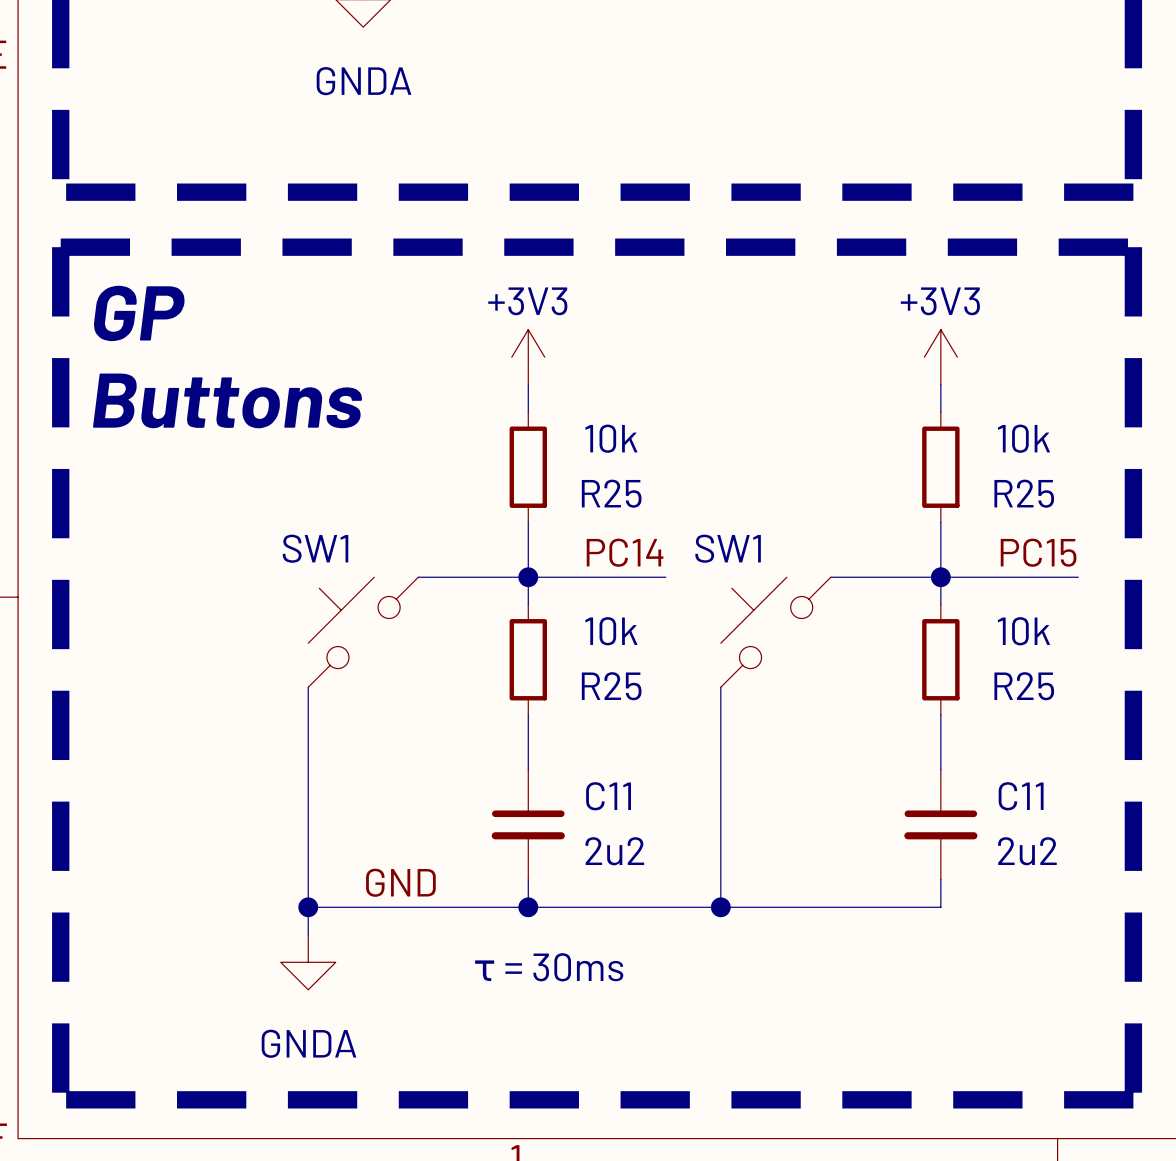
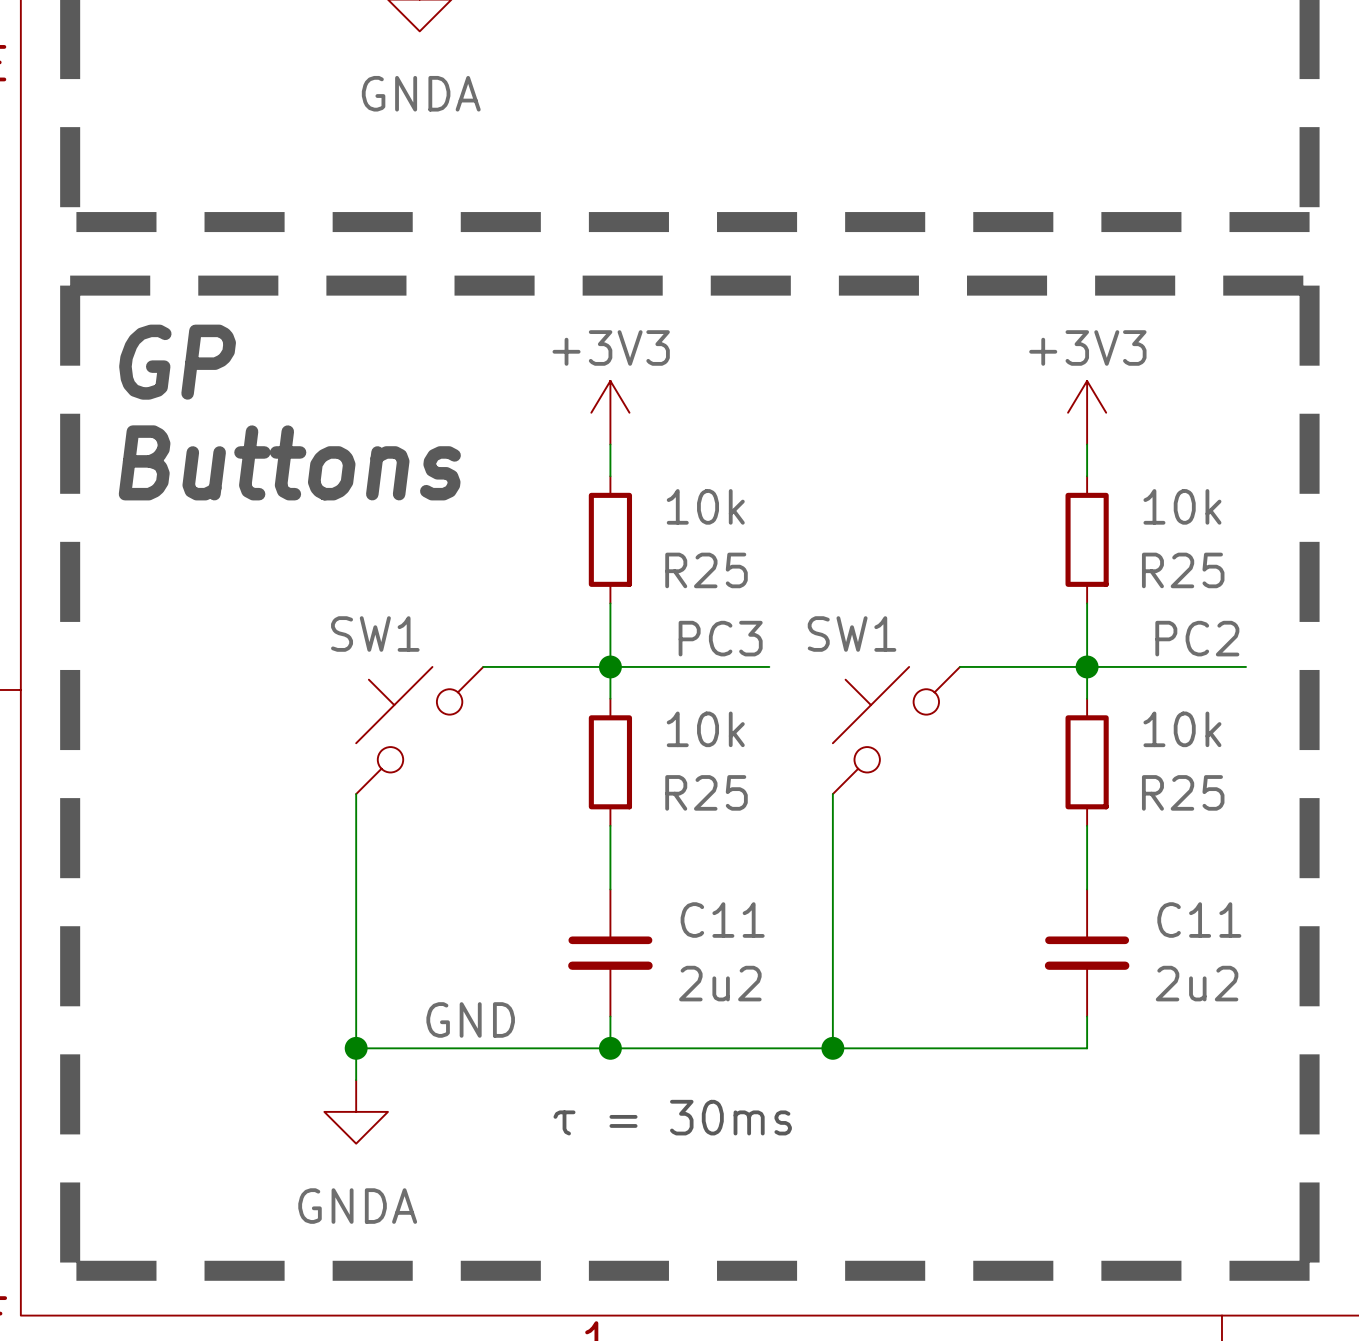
label: PC14 (625, 552) -> PC3 (720, 638)
label: PC15 (1038, 552) -> PC2 (1197, 638)

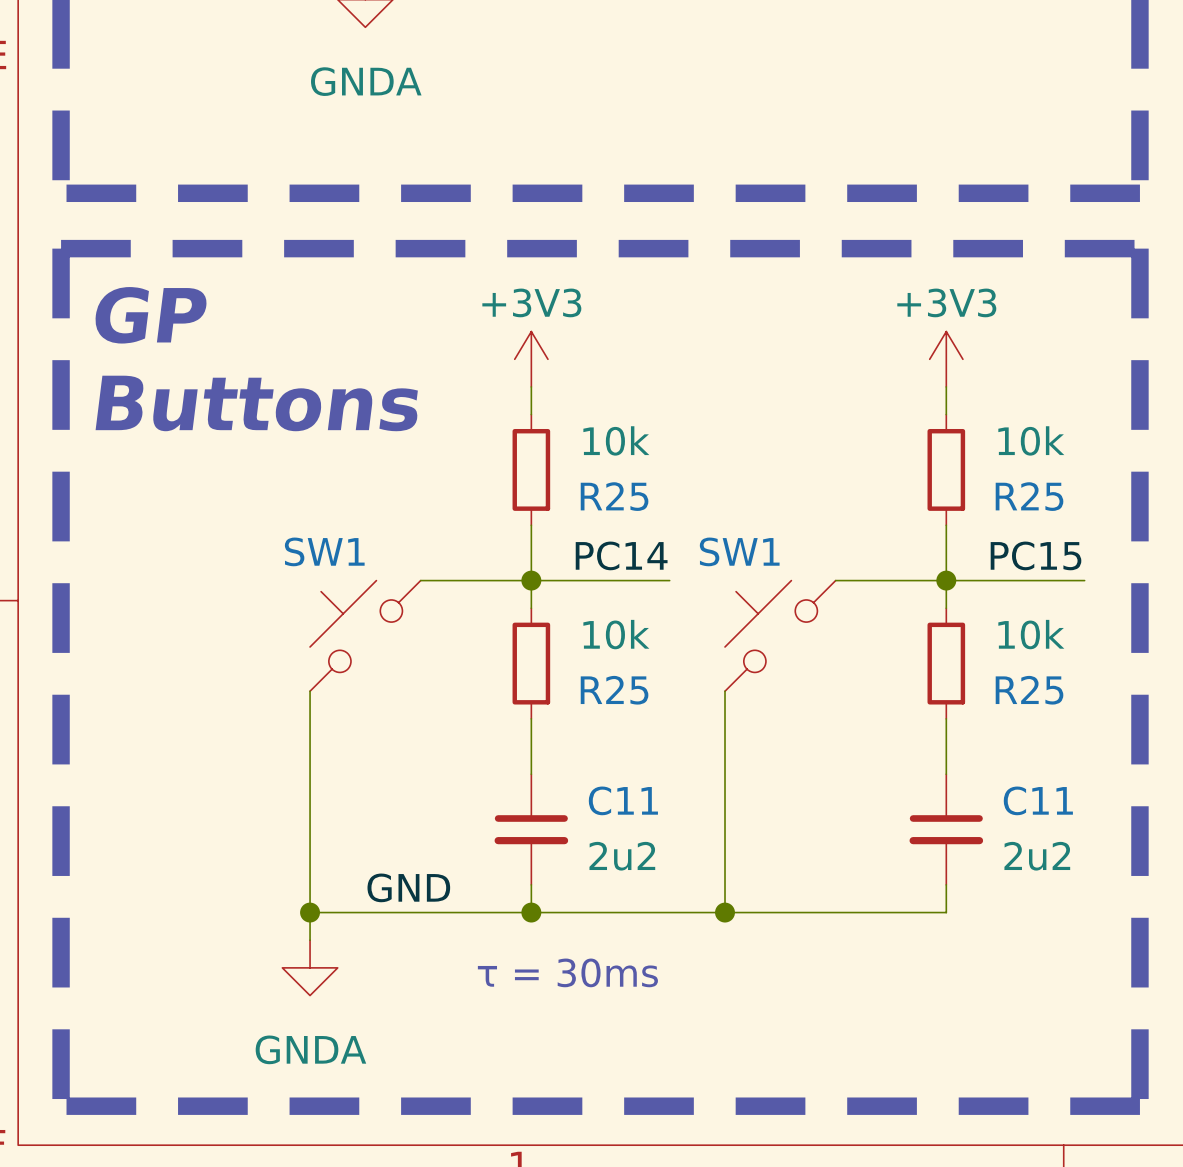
label: PC3 (720, 638) -> PC14 (621, 555)
label: PC2 (1197, 638) -> PC15 (1036, 555)

